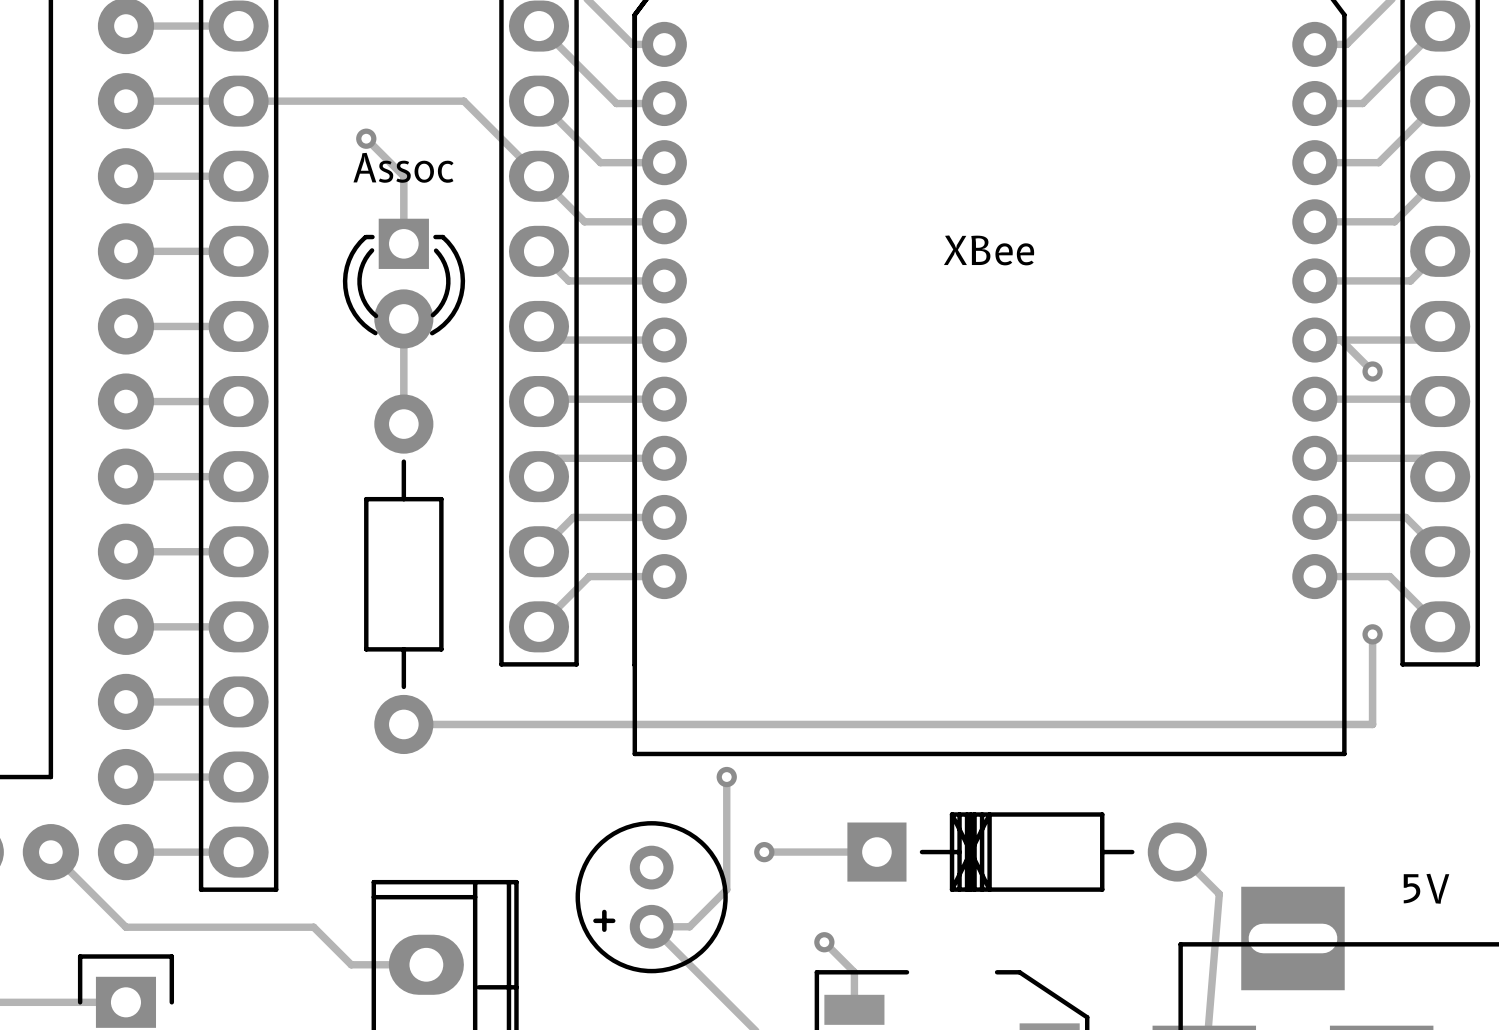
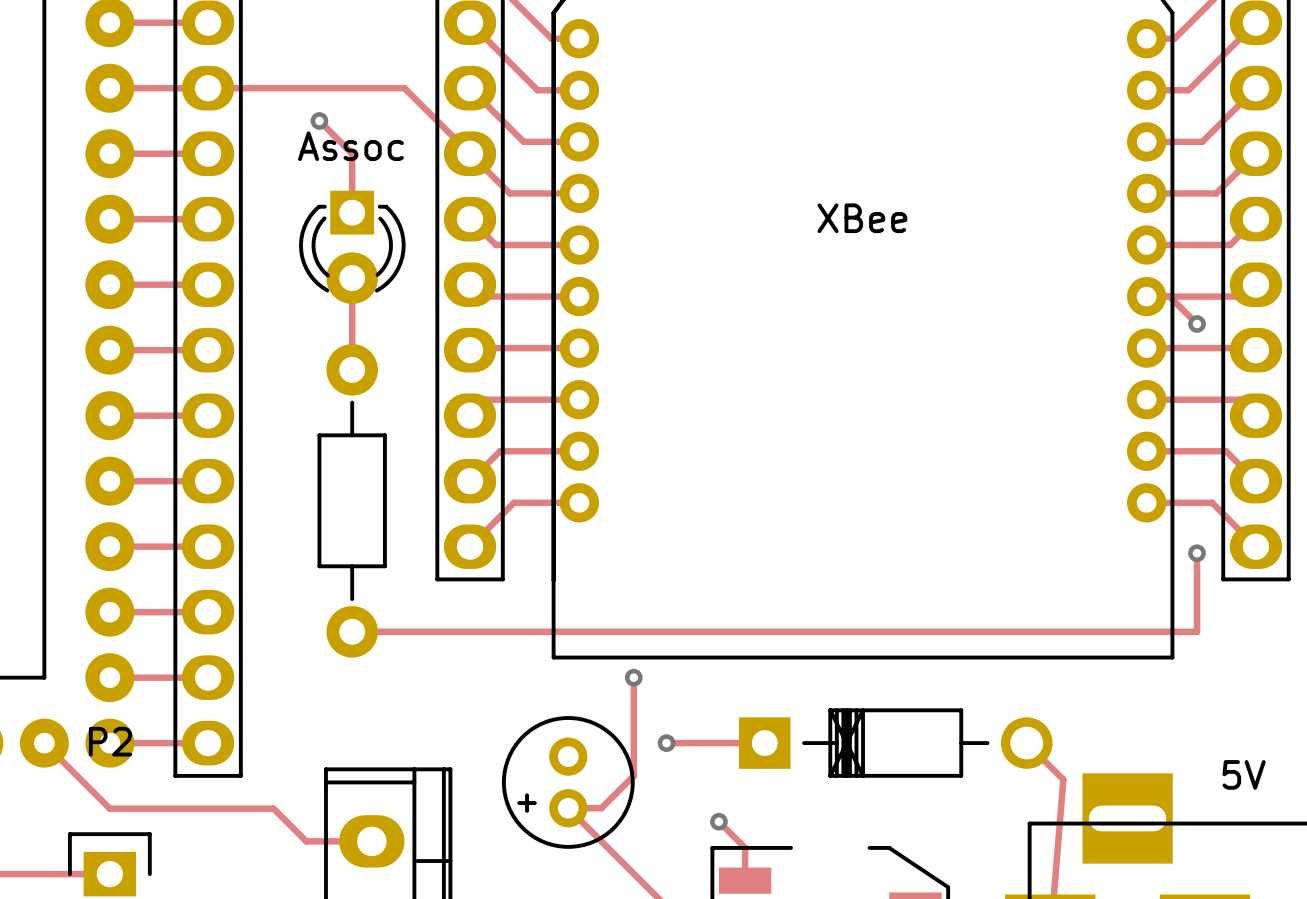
P2 name: none -> P2 (110, 741)

